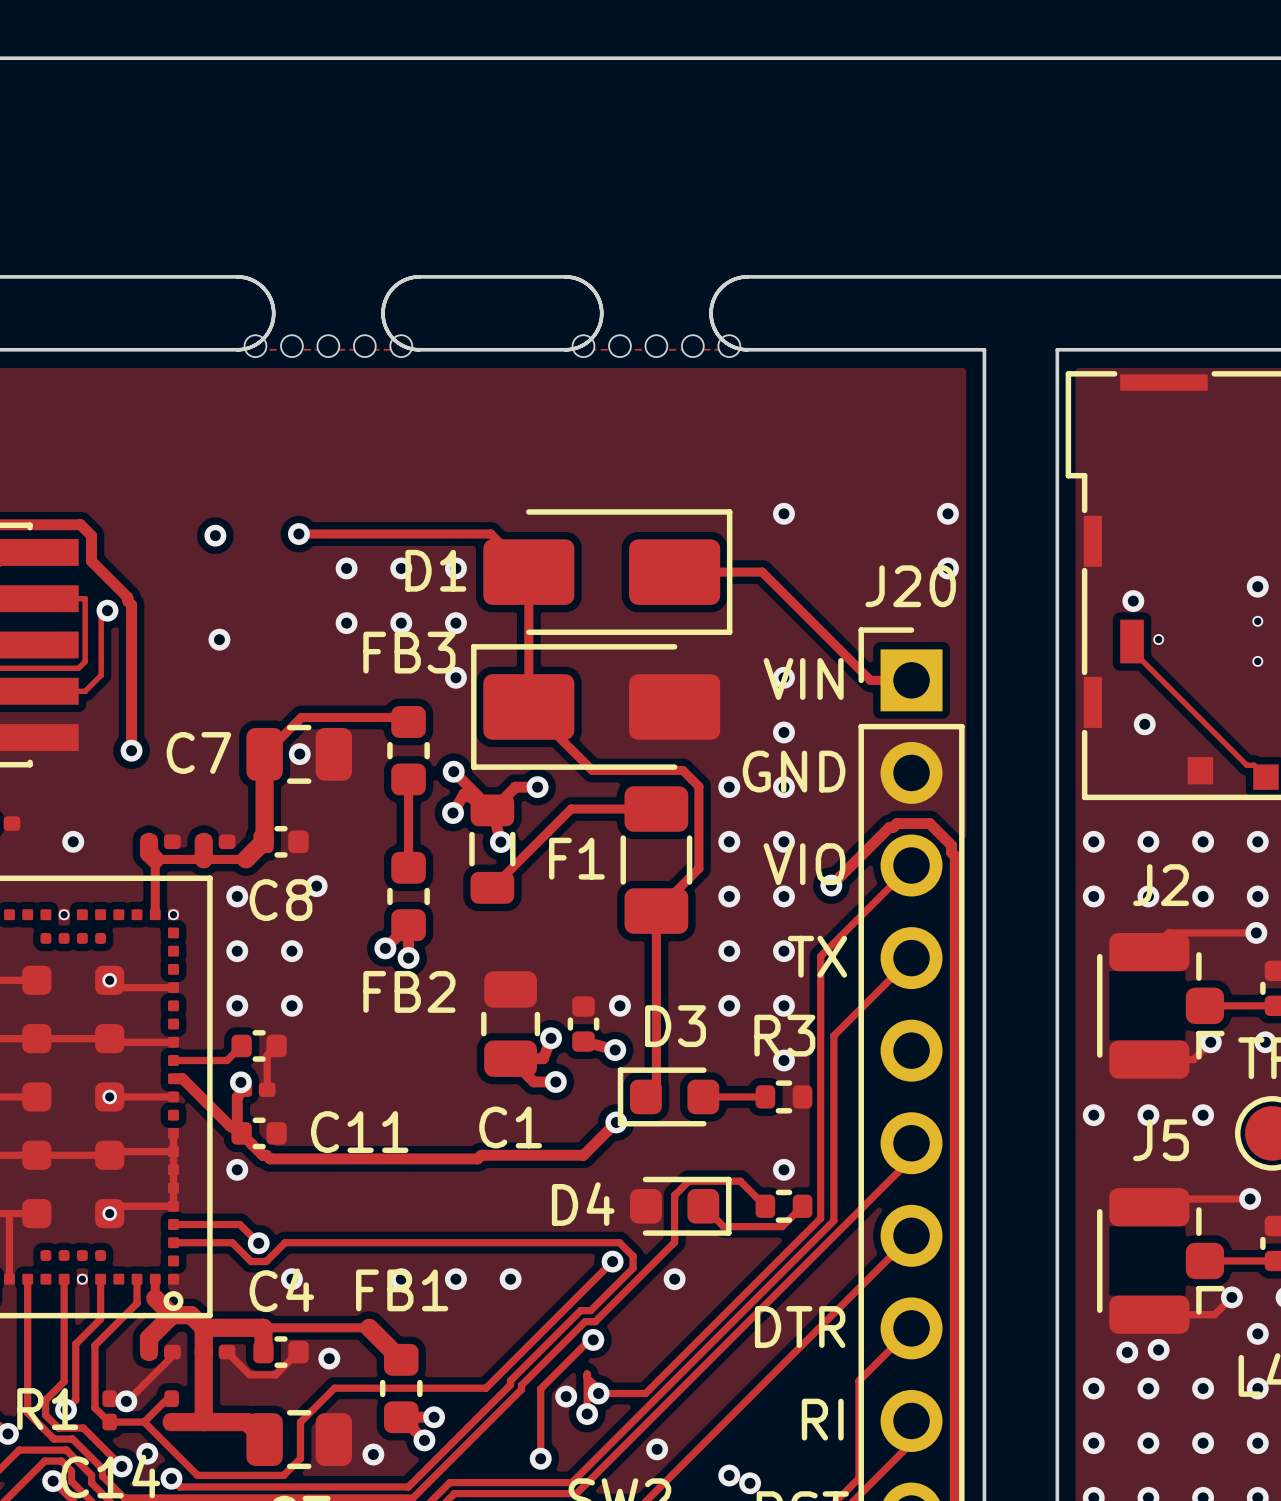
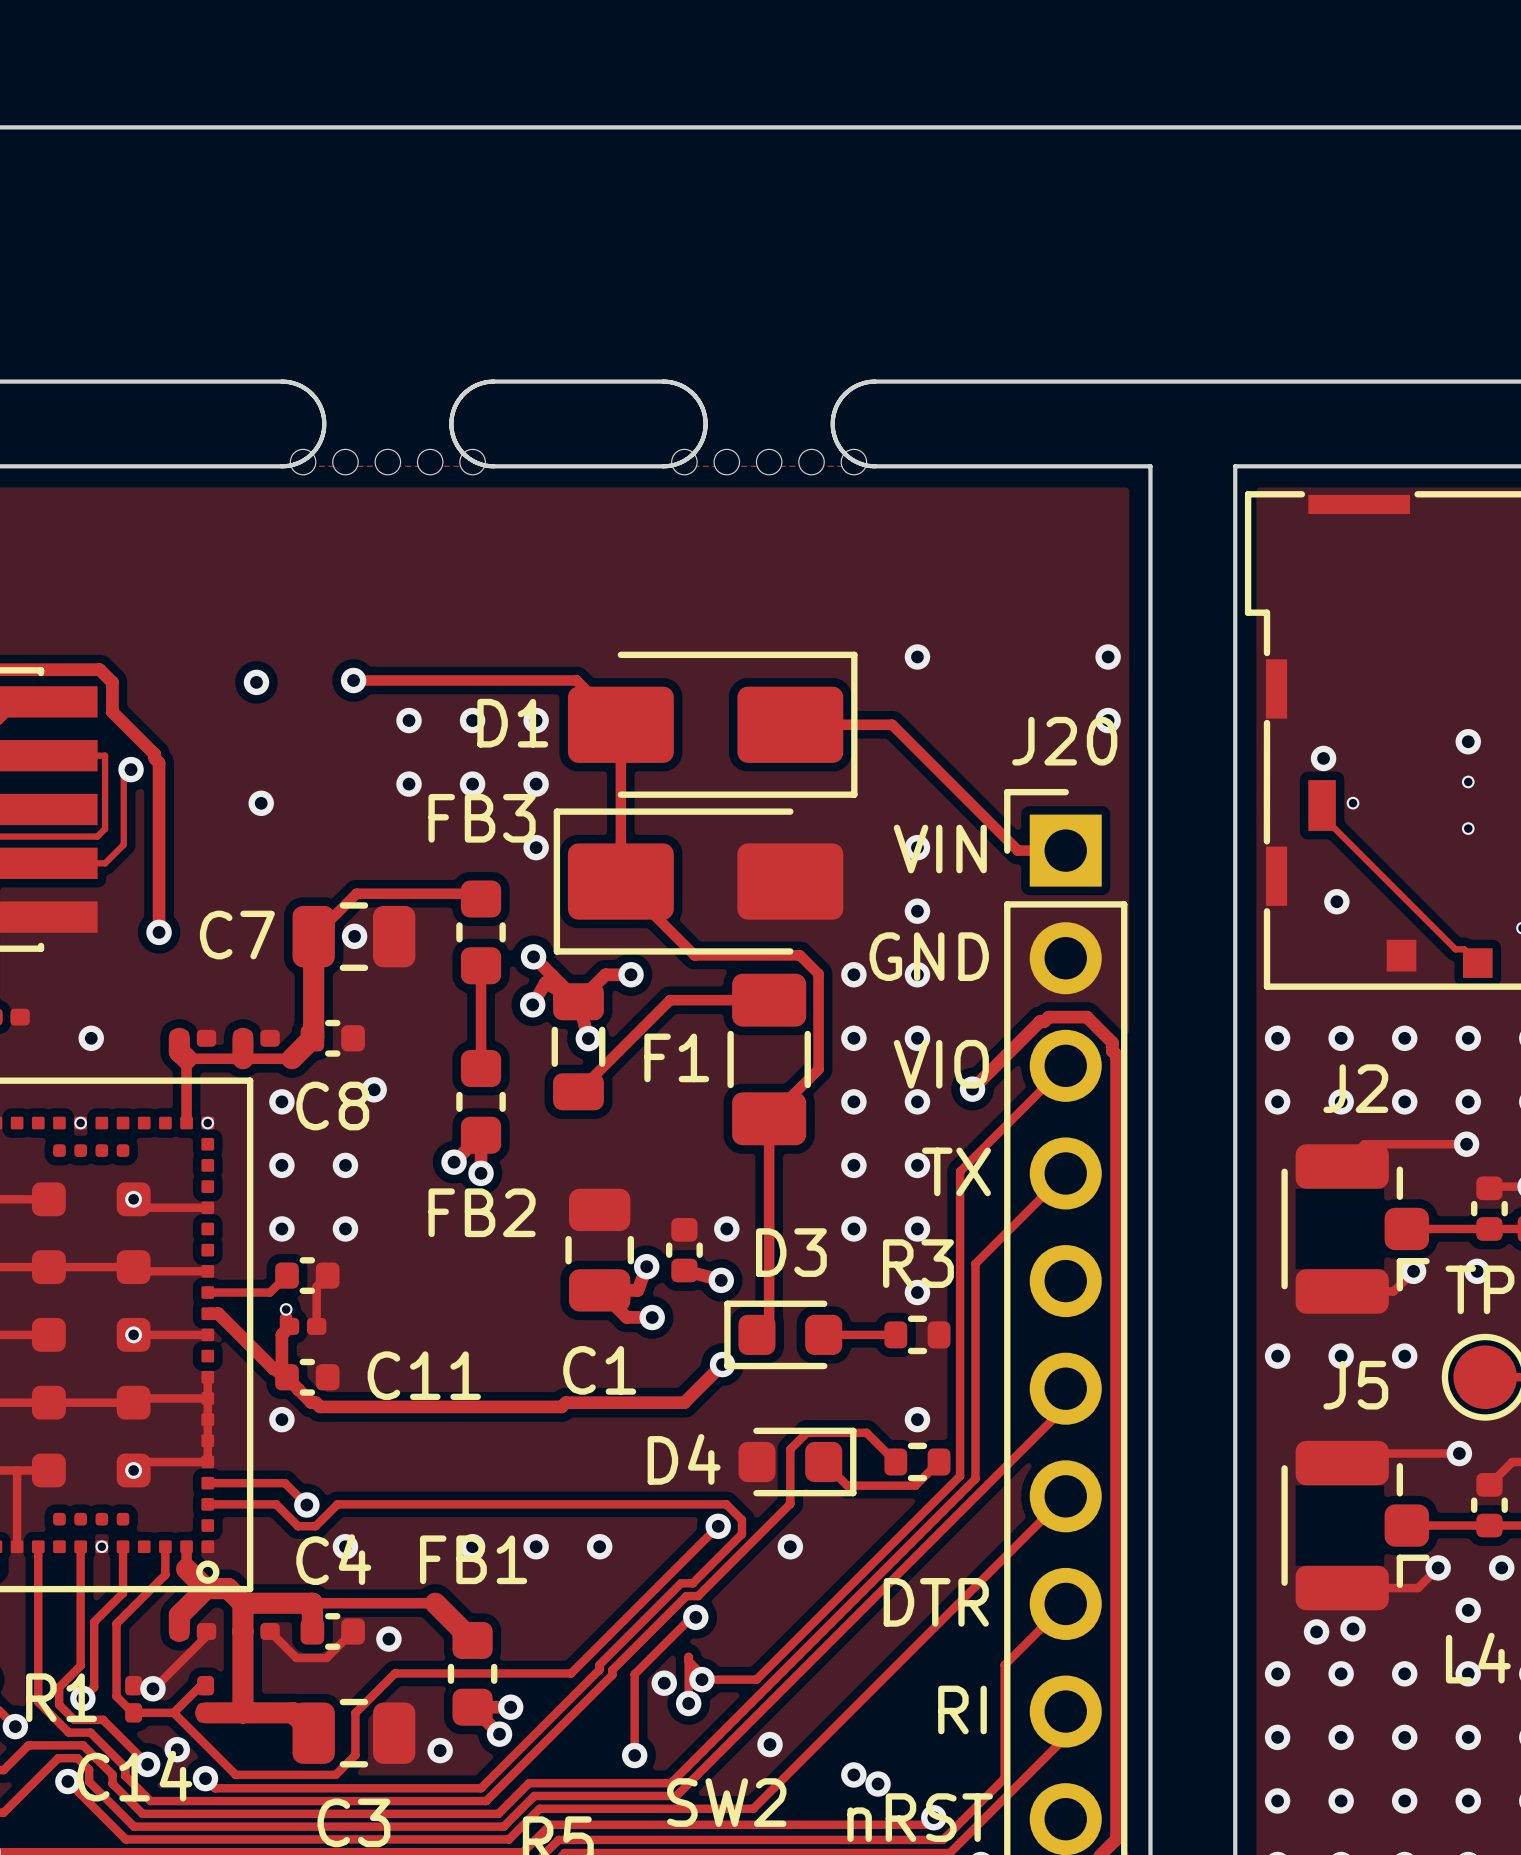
via size: [229, 1071, 252, 1094] -> [279, 1303, 293, 1316]

